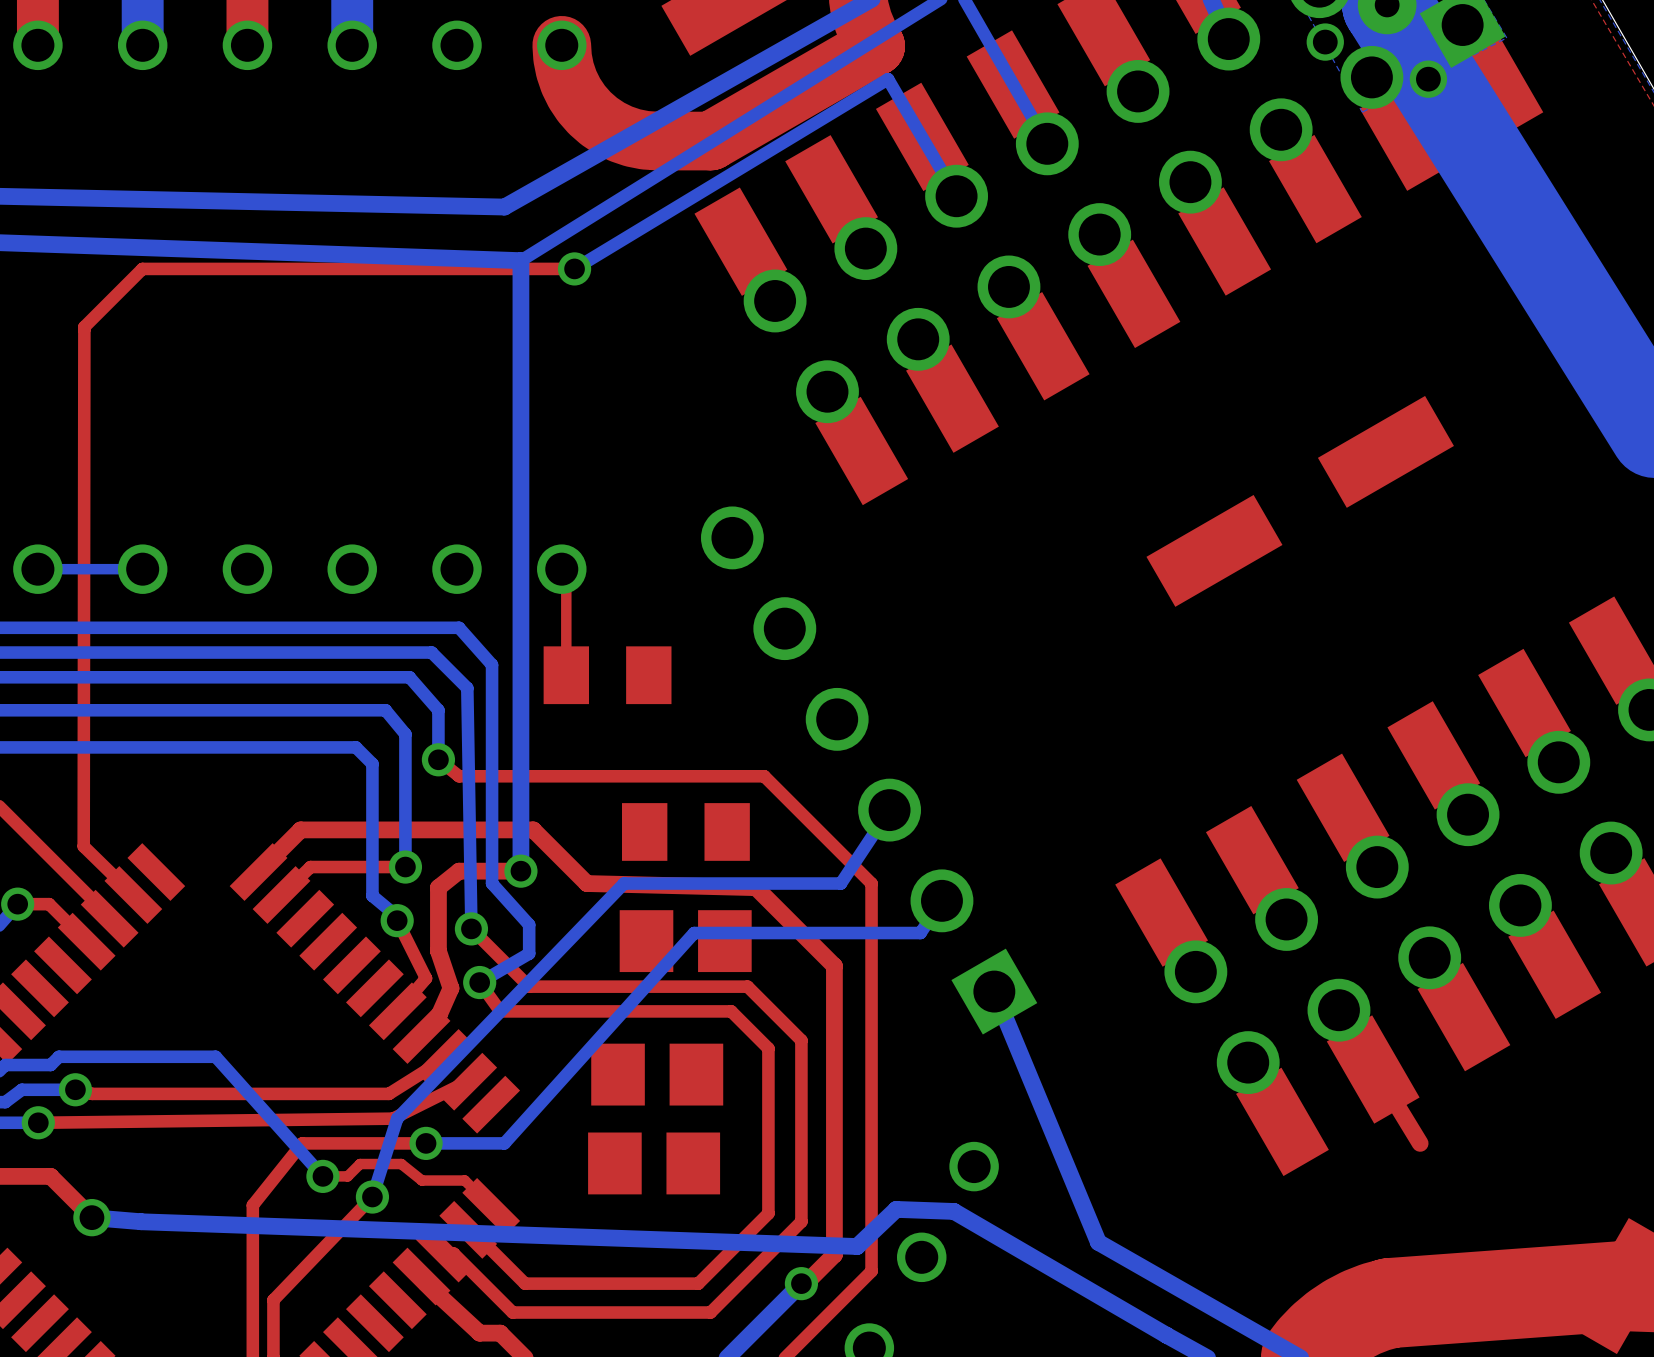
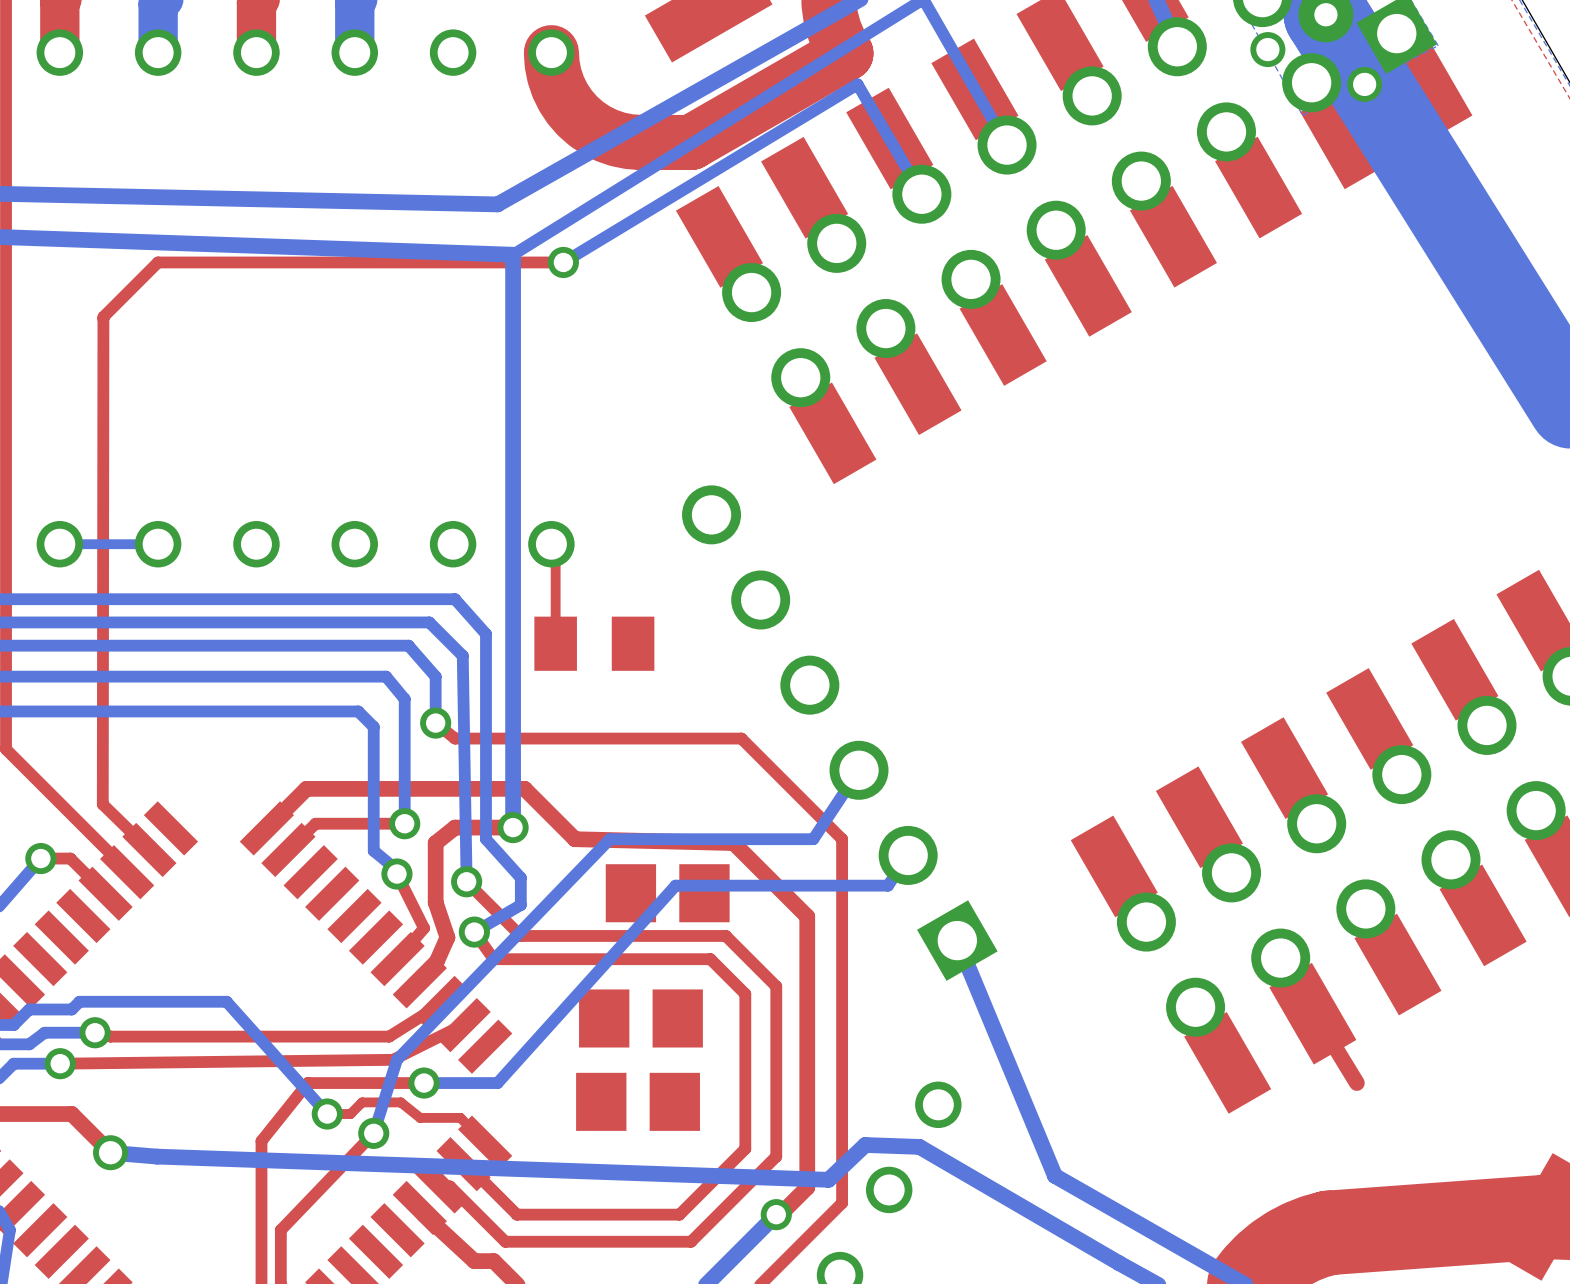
part: (1300, 501) -> none
part: (685, 831) -> none

